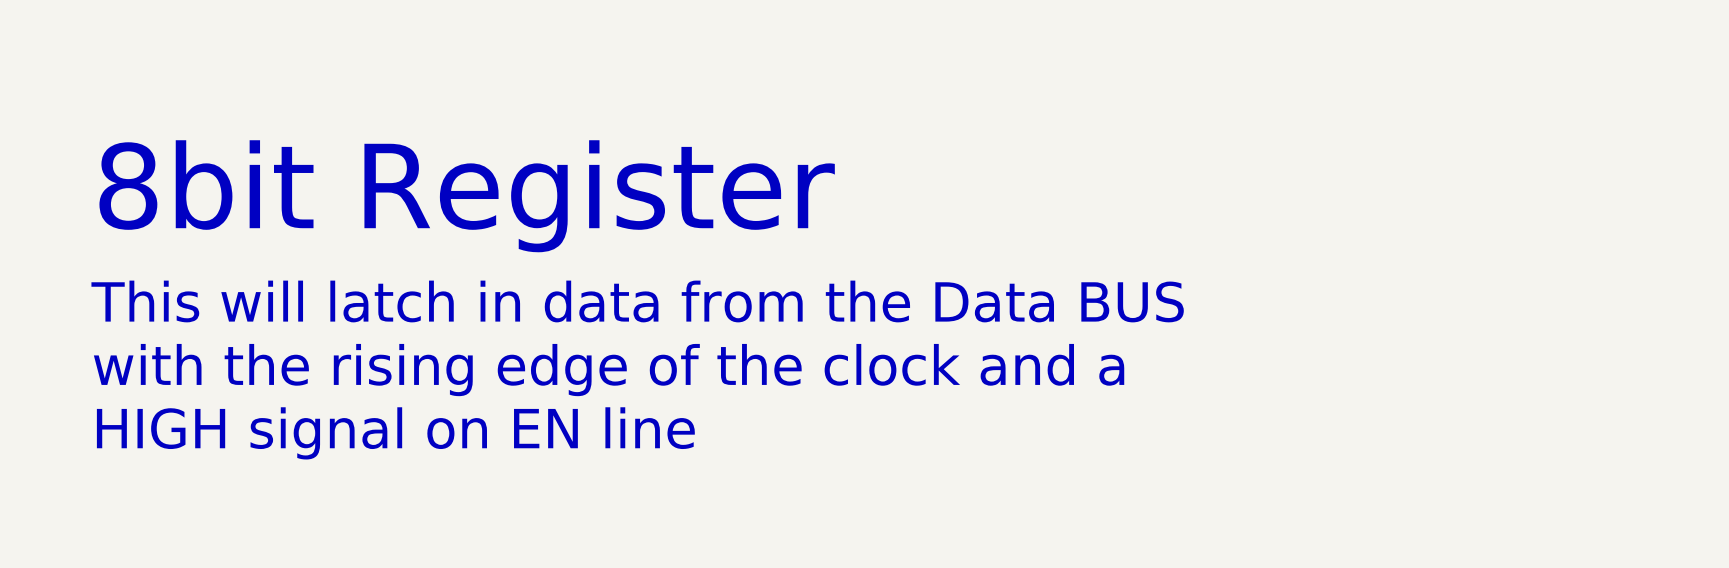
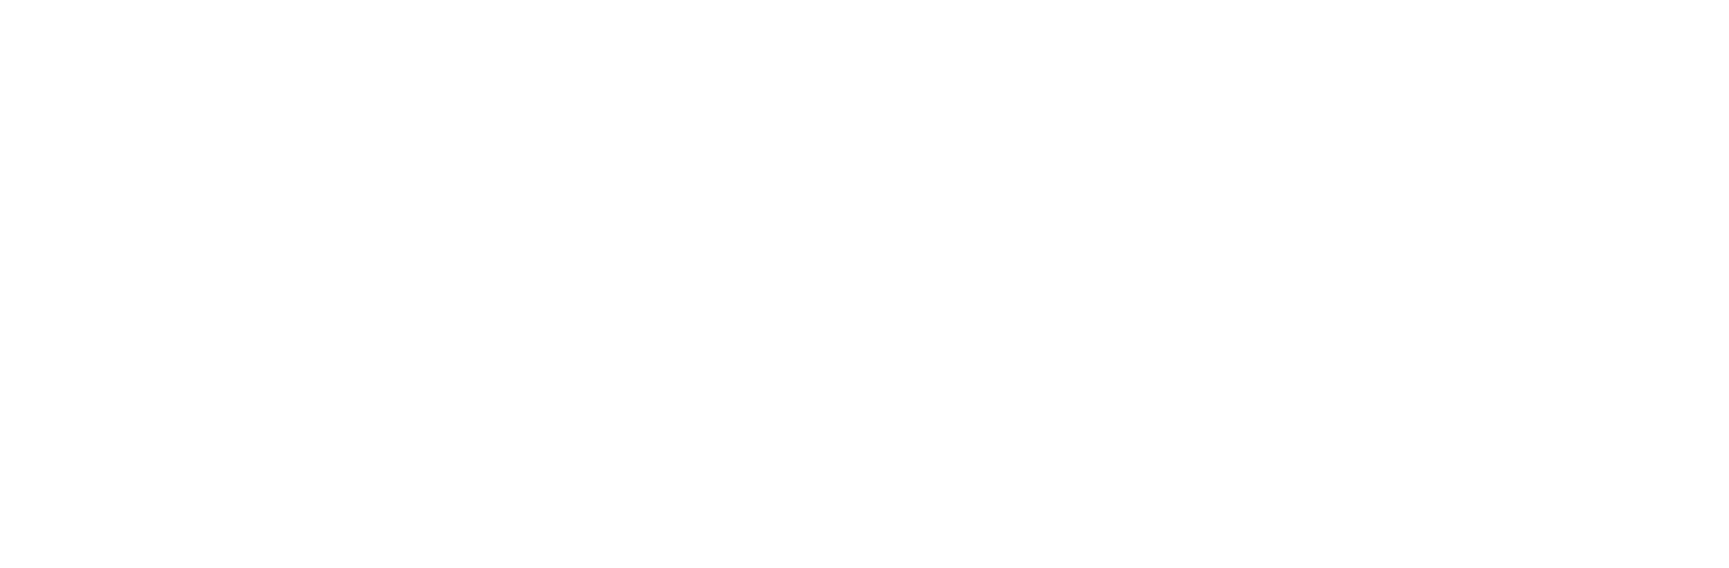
text: 8bit Register (467, 196) -> none
text: This will latch in data from the Data BUS (637, 301) -> none
text: with the rising edge of the clock and a (609, 370) -> none
text: HIGH signal on EN line (395, 433) -> none

